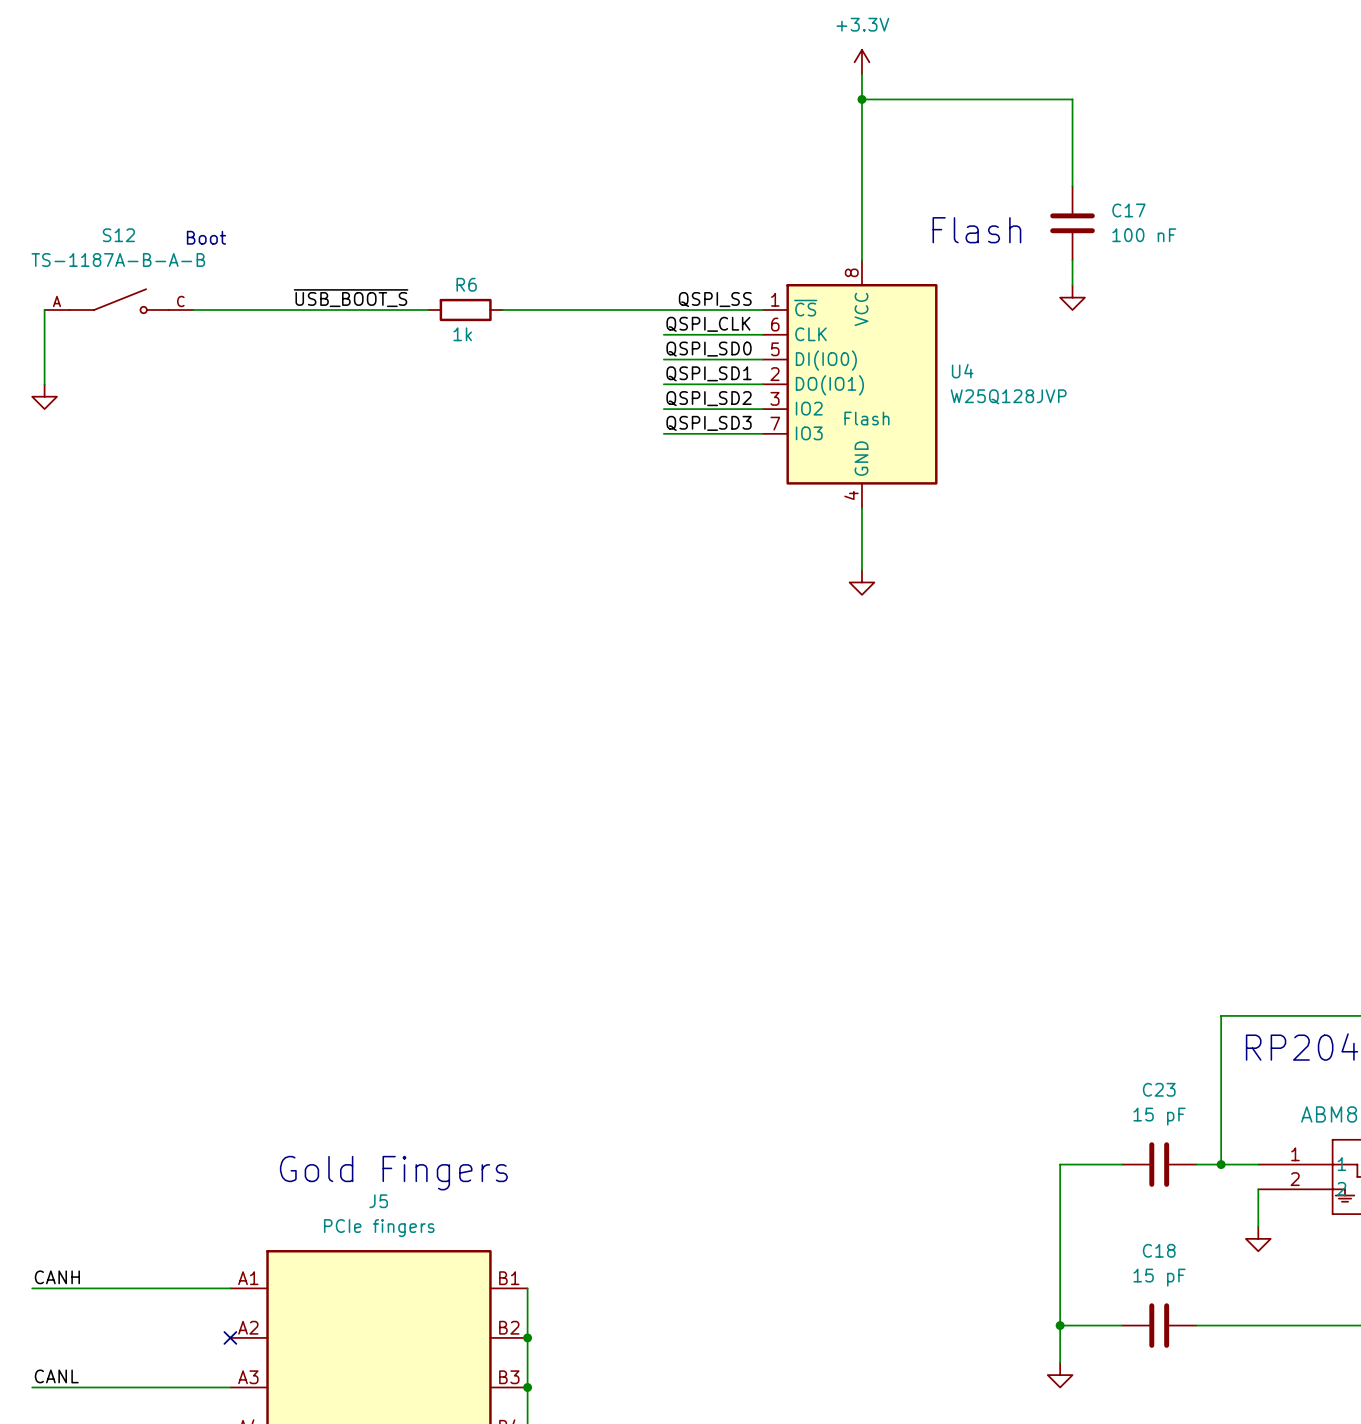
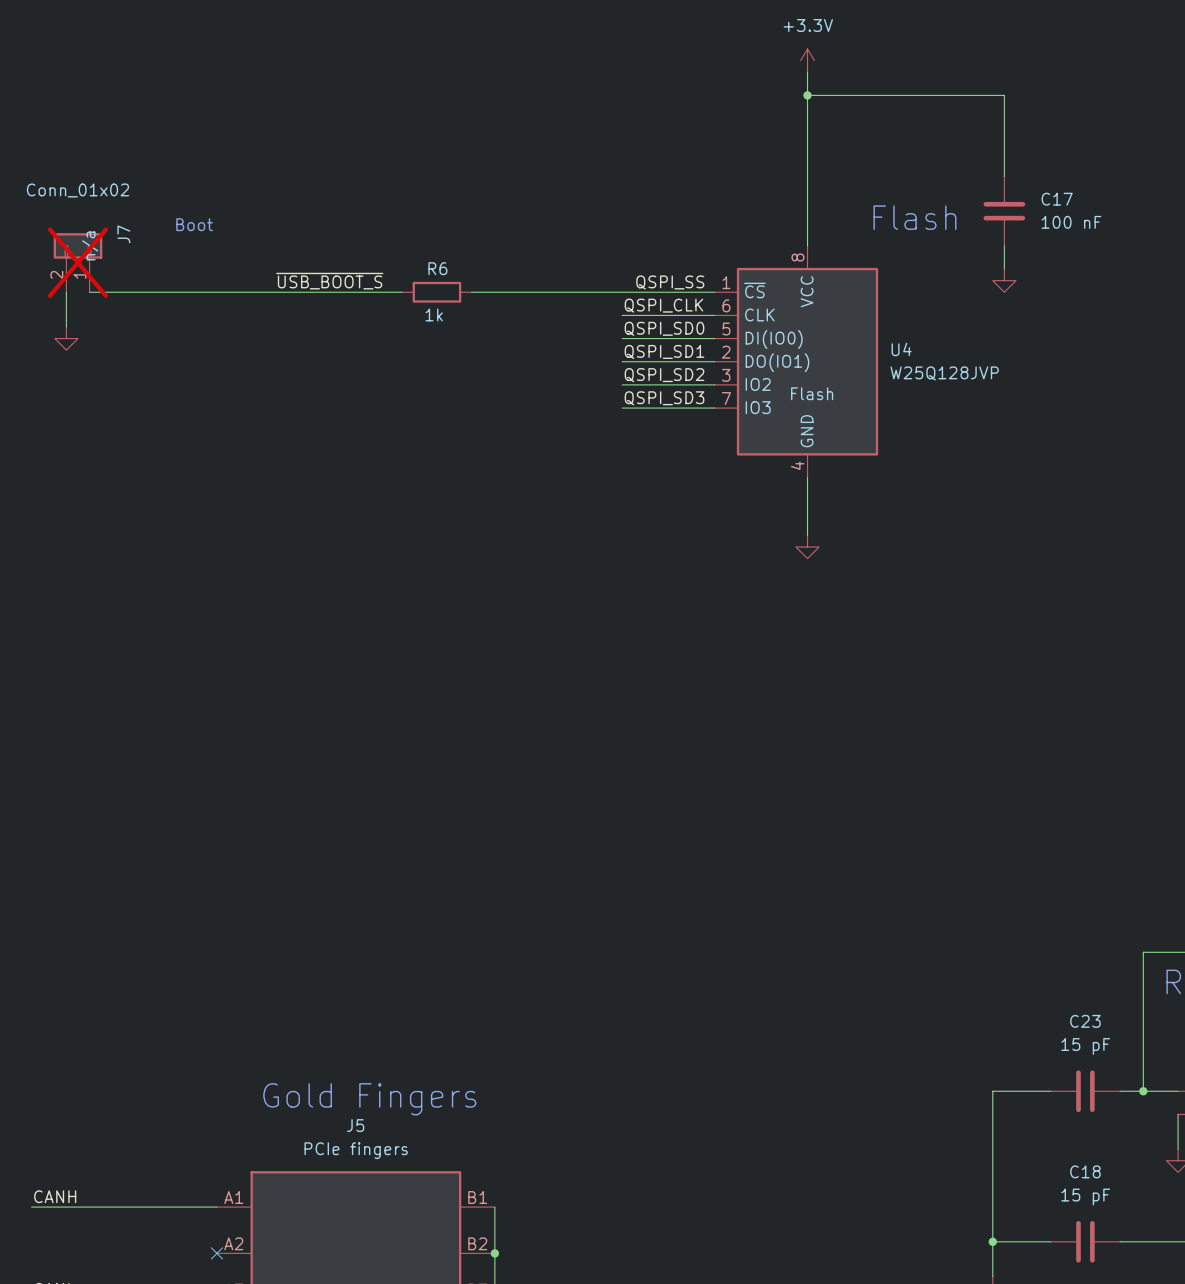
J7: none -> Conn_01x02 (77, 262)
S12: TS-1187A-B-A-B (118, 301) -> none
wire: (44, 310) (44, 384) -> none
wire: none -> (66, 292) (66, 326)
wire: none -> (89, 292) (182, 292)
power symbol position: (44, 396) -> (66, 338)

